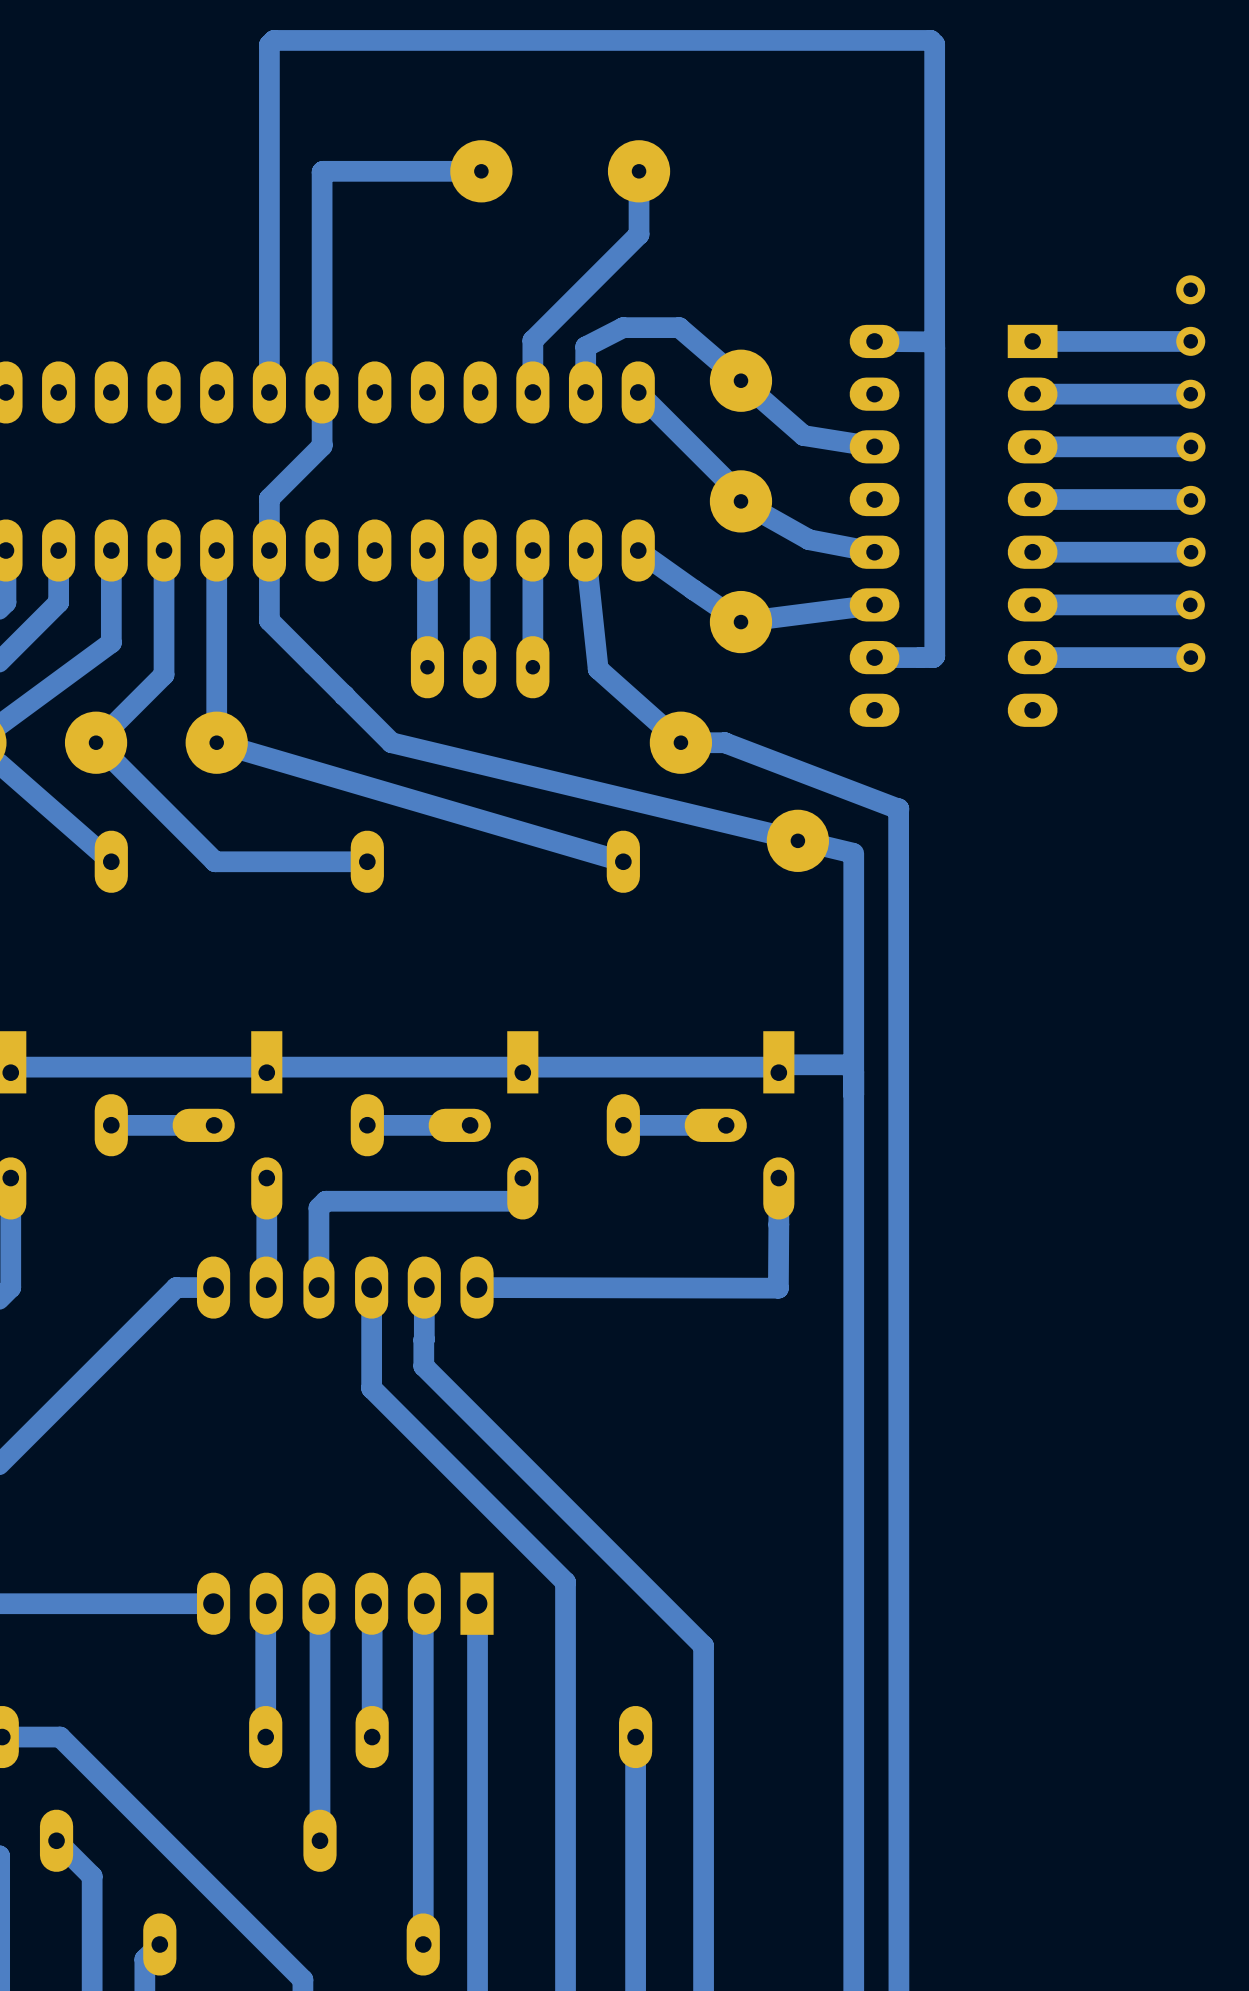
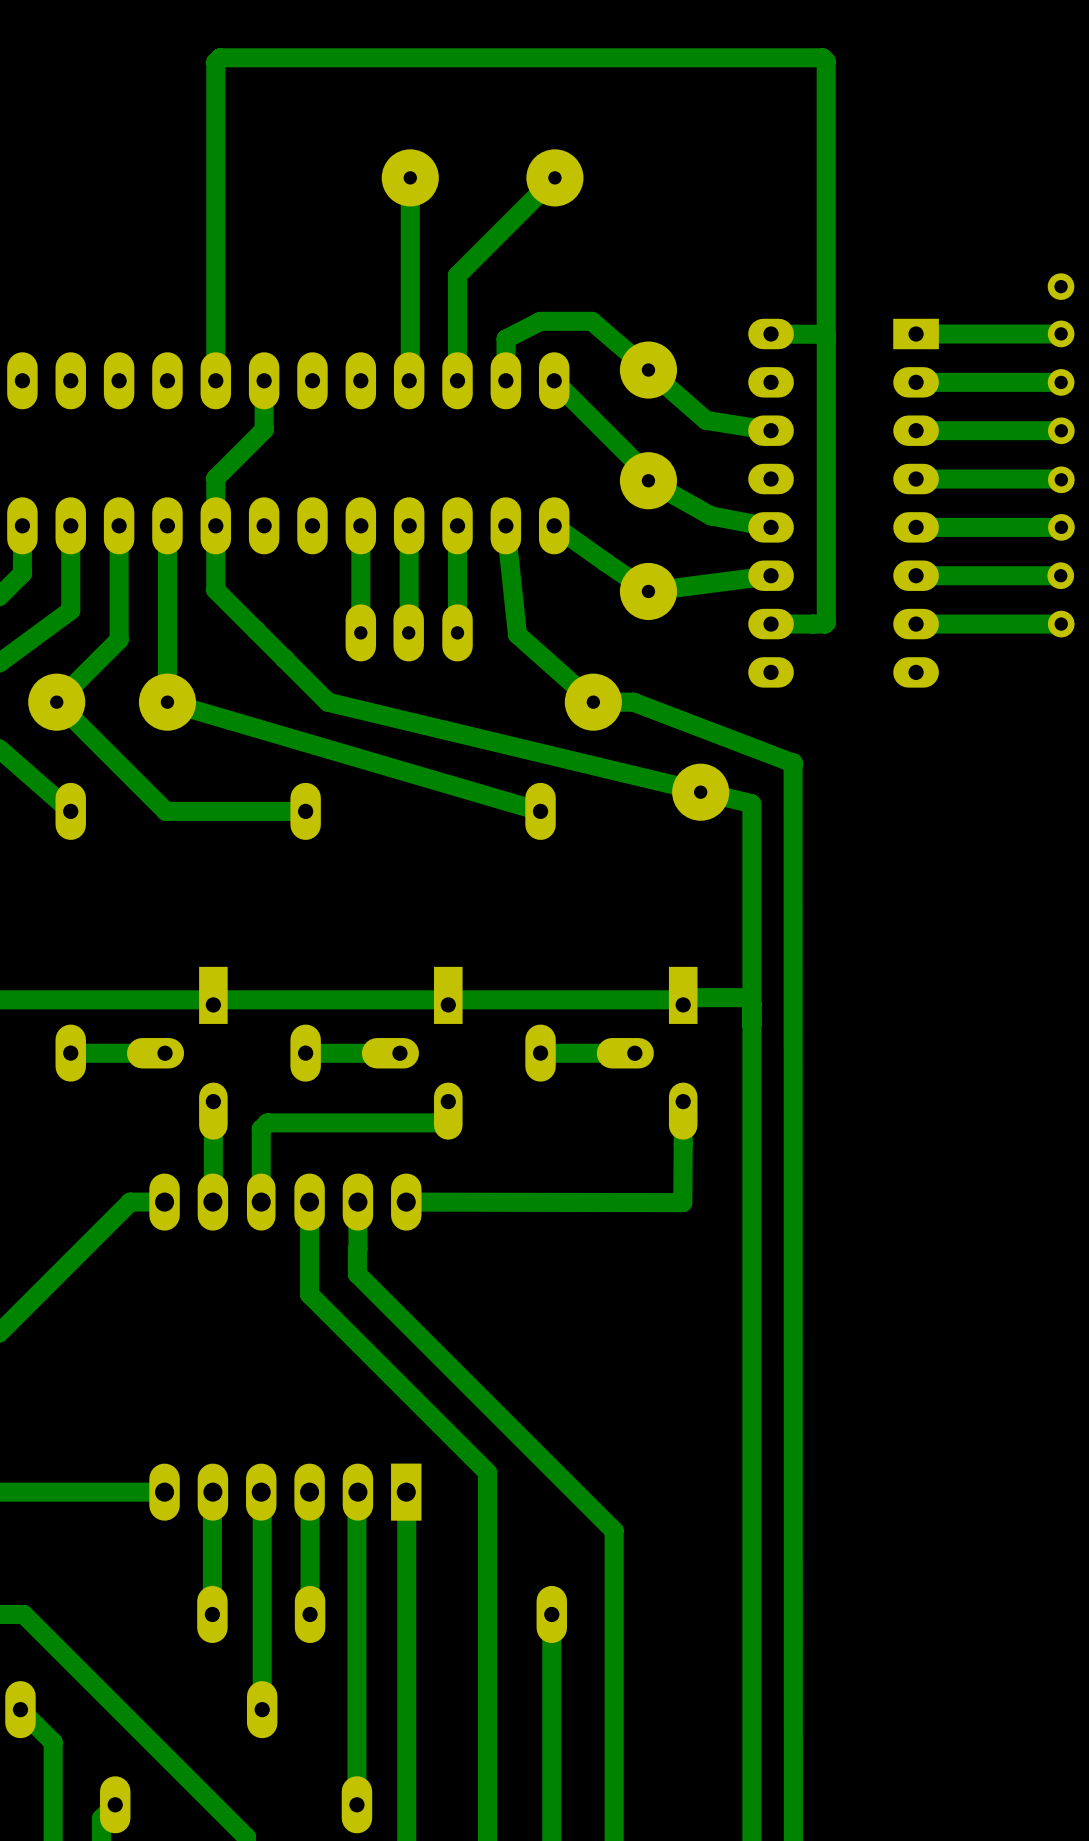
track: (481, 171) (322, 172) (322, 392) -> (410, 177) (409, 380)
track: (639, 171) (639, 234) (532, 340) -> (554, 177) (457, 275) (457, 333)

